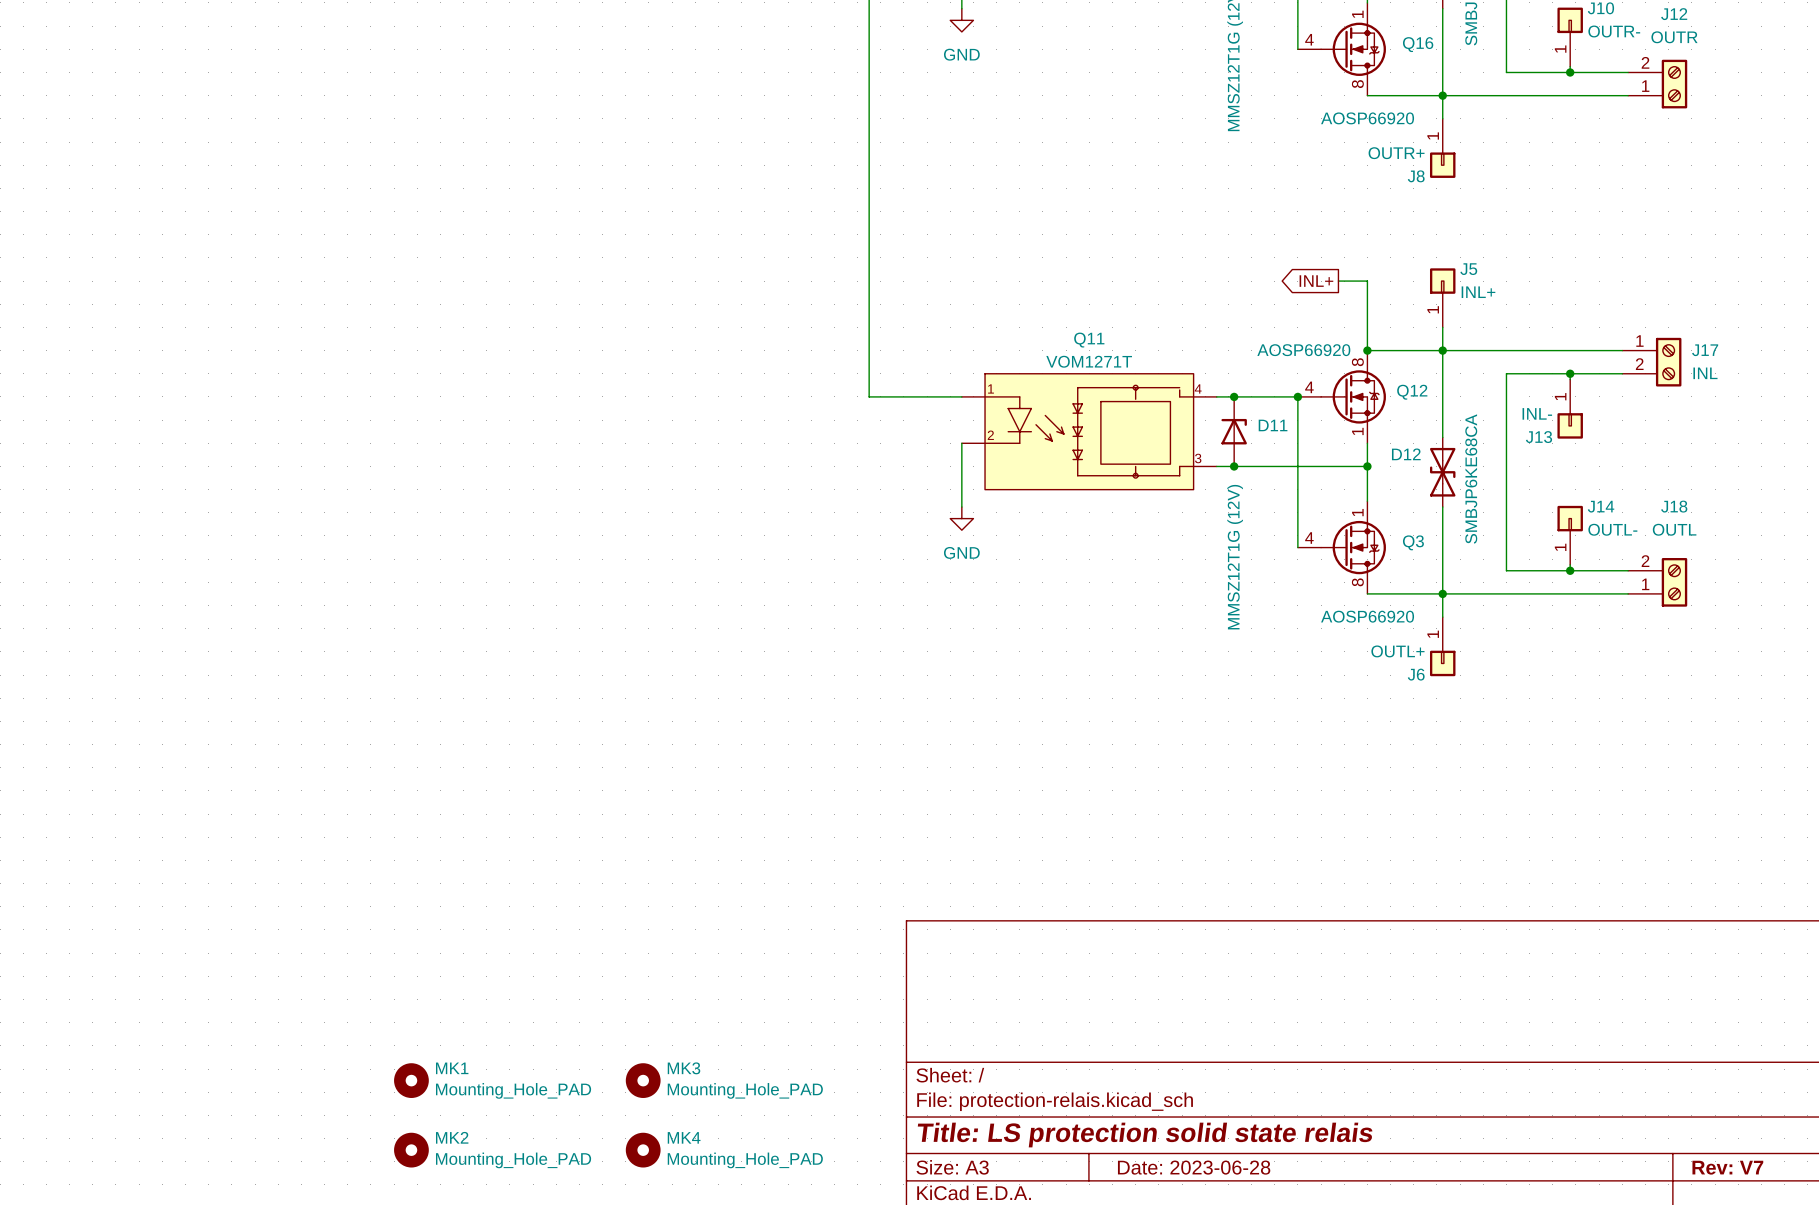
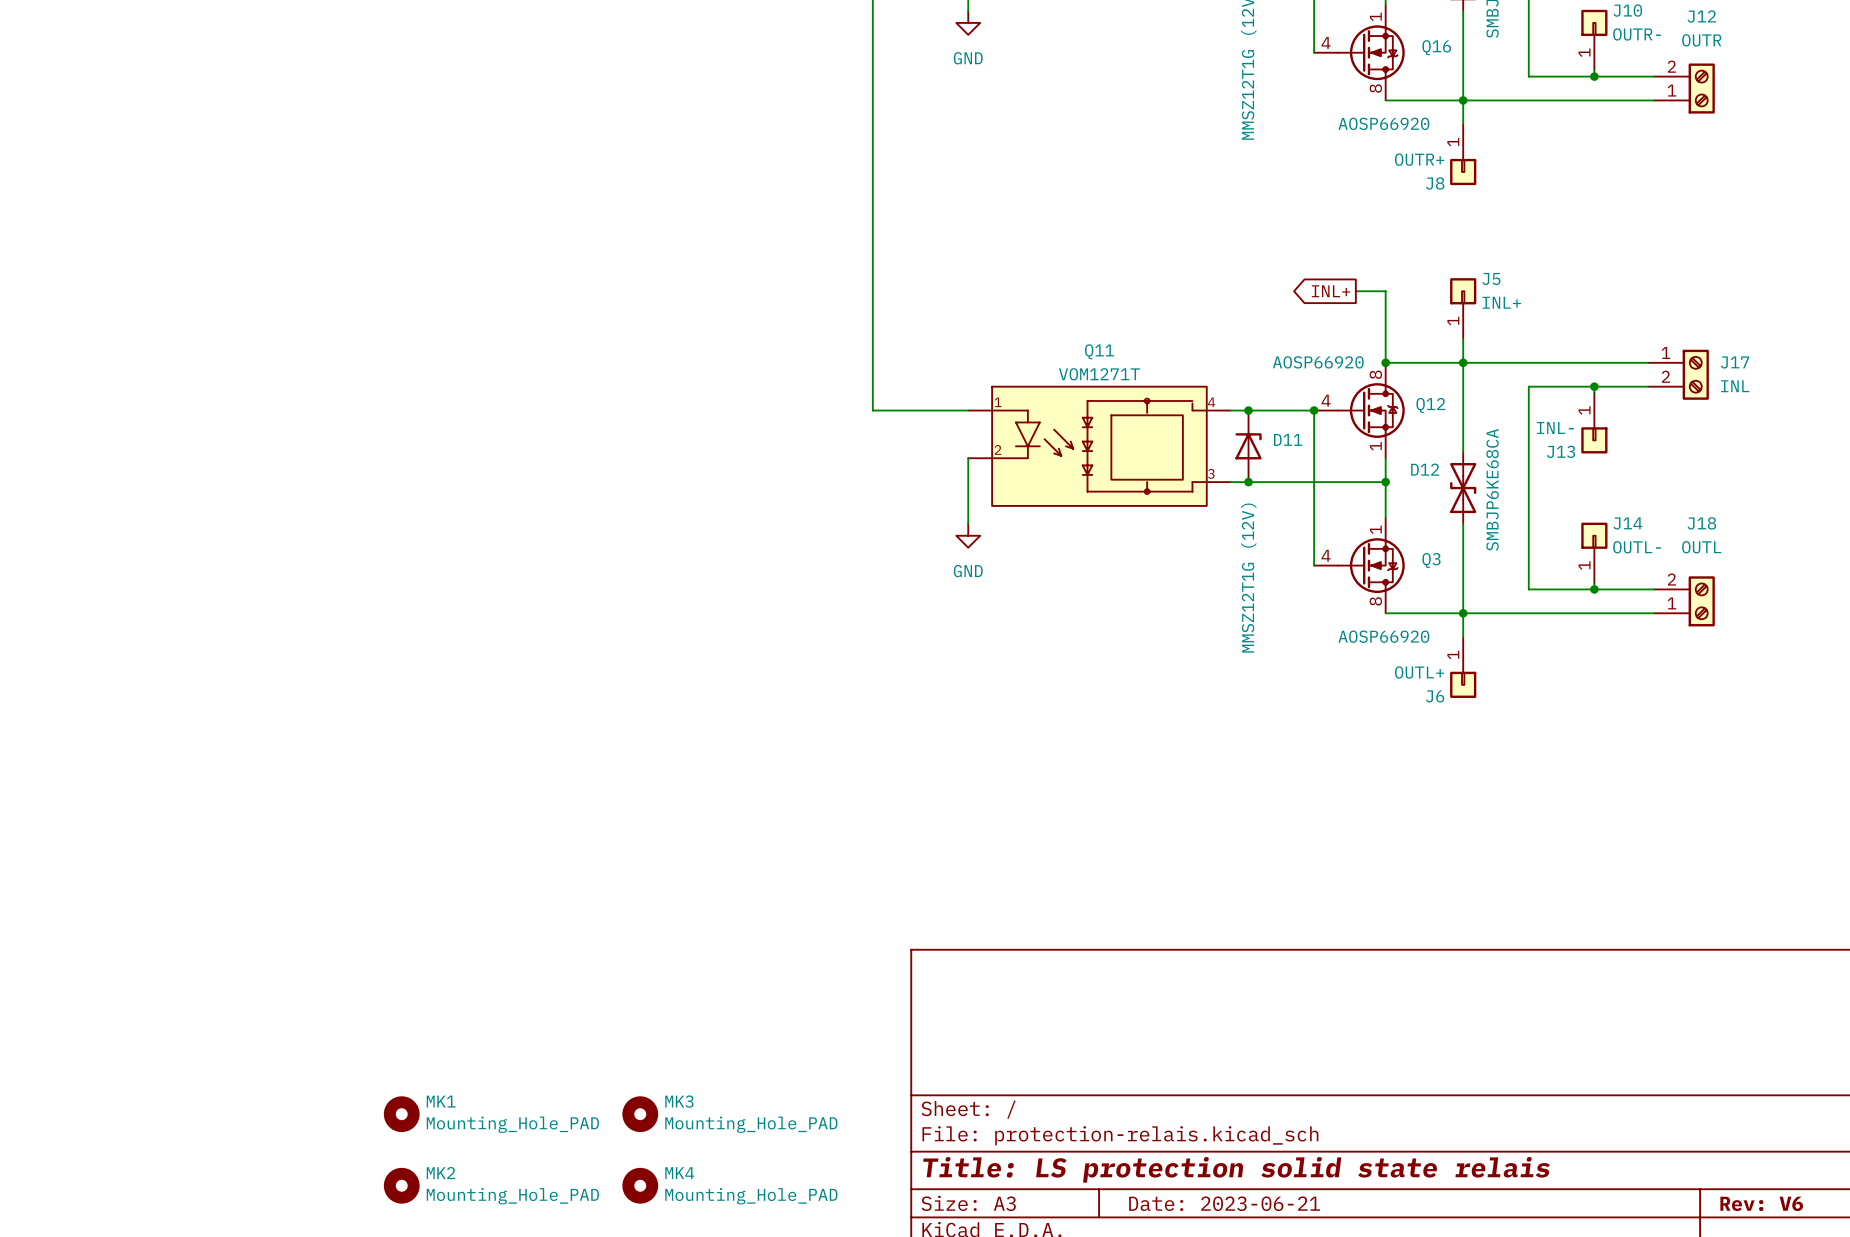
title block: Date: 2023-06-28 (1194, 1167) -> Date: 2023-06-21 (1224, 1203)
title block: Rev: V7 (1727, 1167) -> Rev: V6 (1761, 1203)

